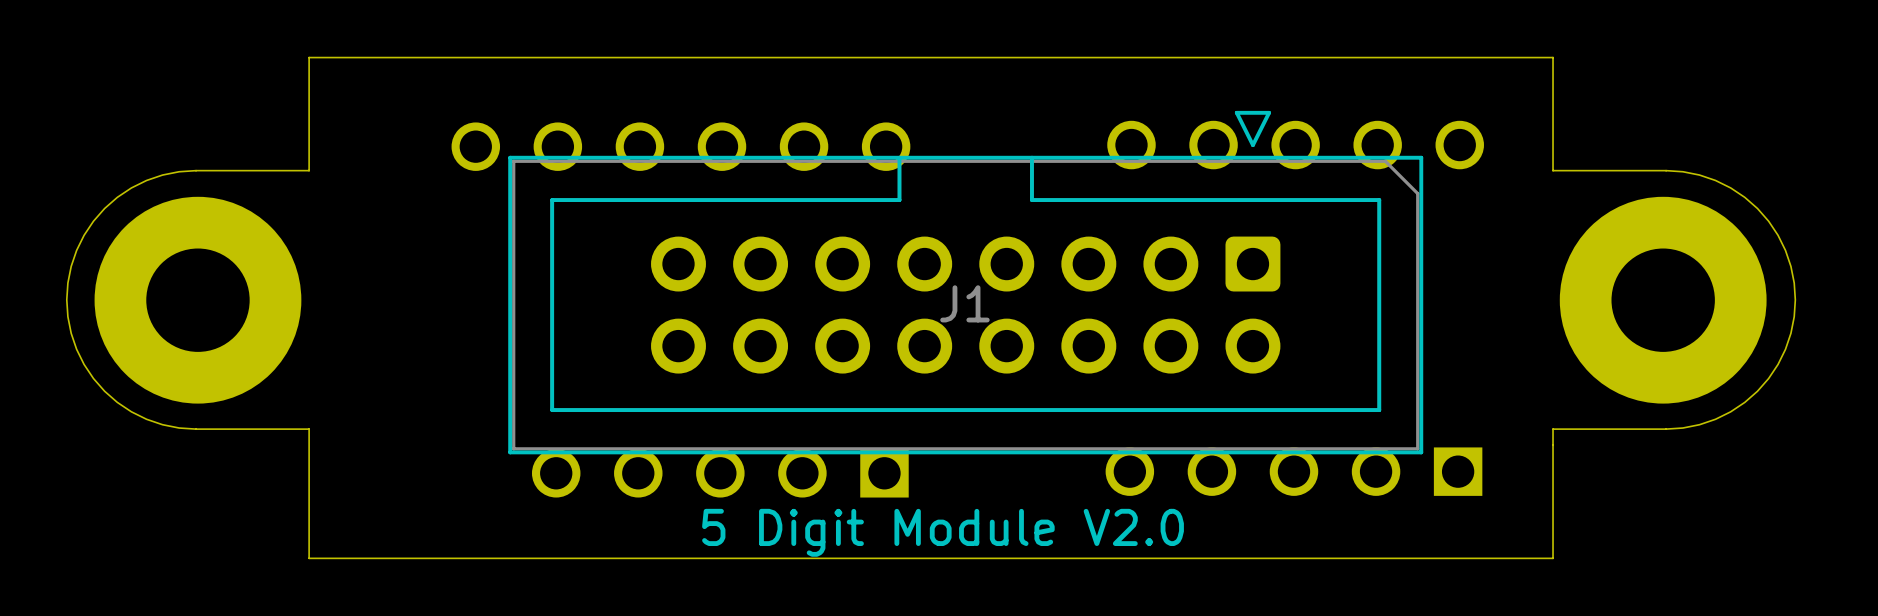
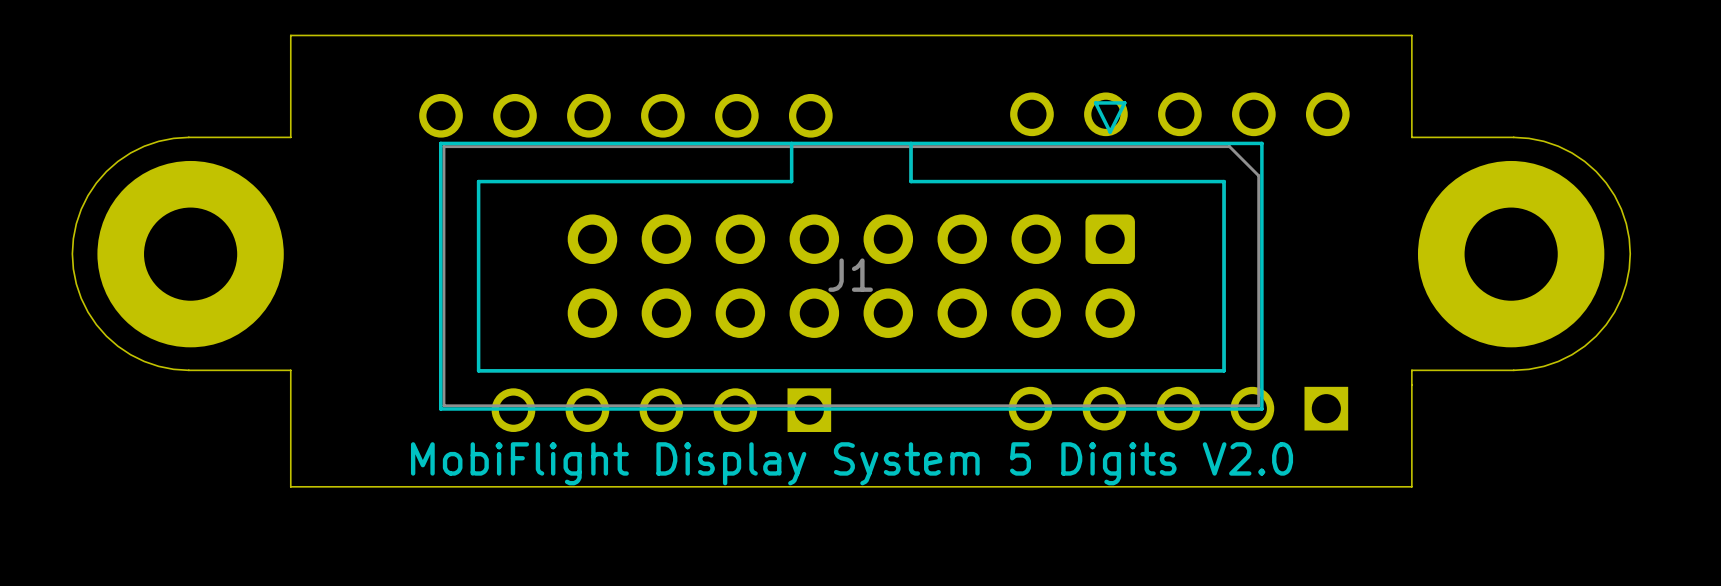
J1 footprint: [508, 110, 1424, 455] -> [438, 101, 1264, 411]
text: 5 Digit Module V2.0 (943, 532) -> MobiFlight Display System 5 Digits V2.0 (852, 463)

